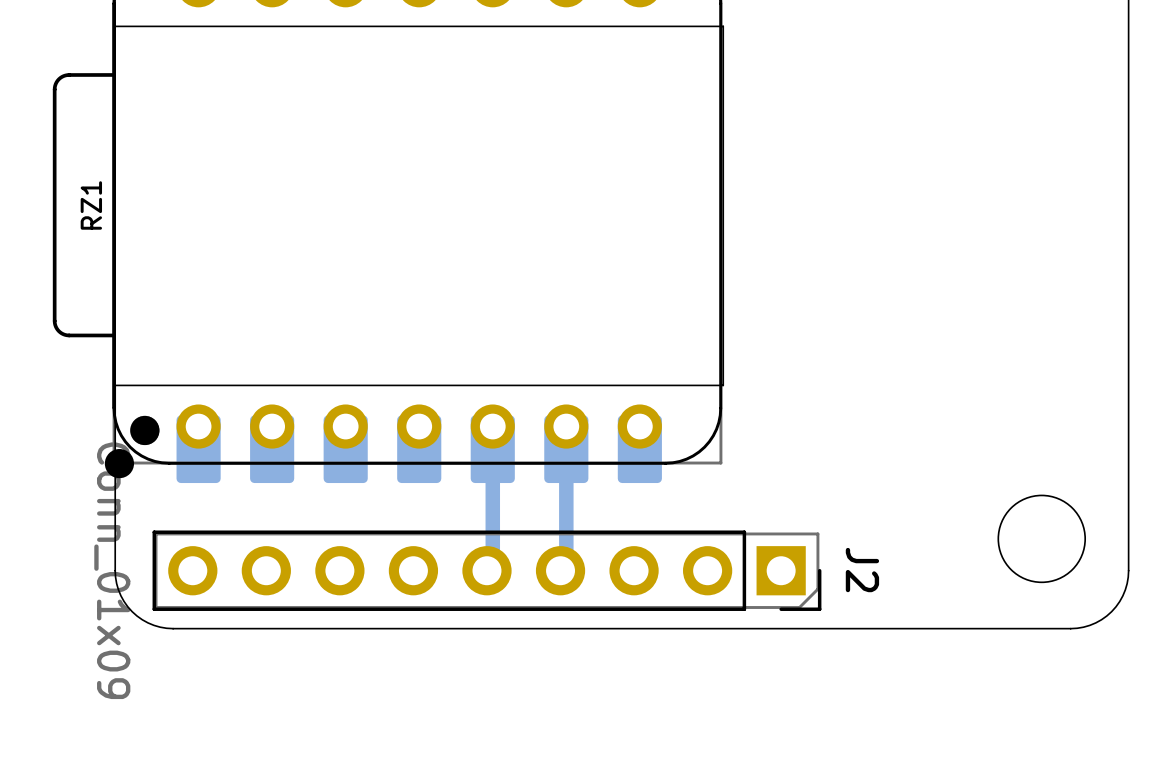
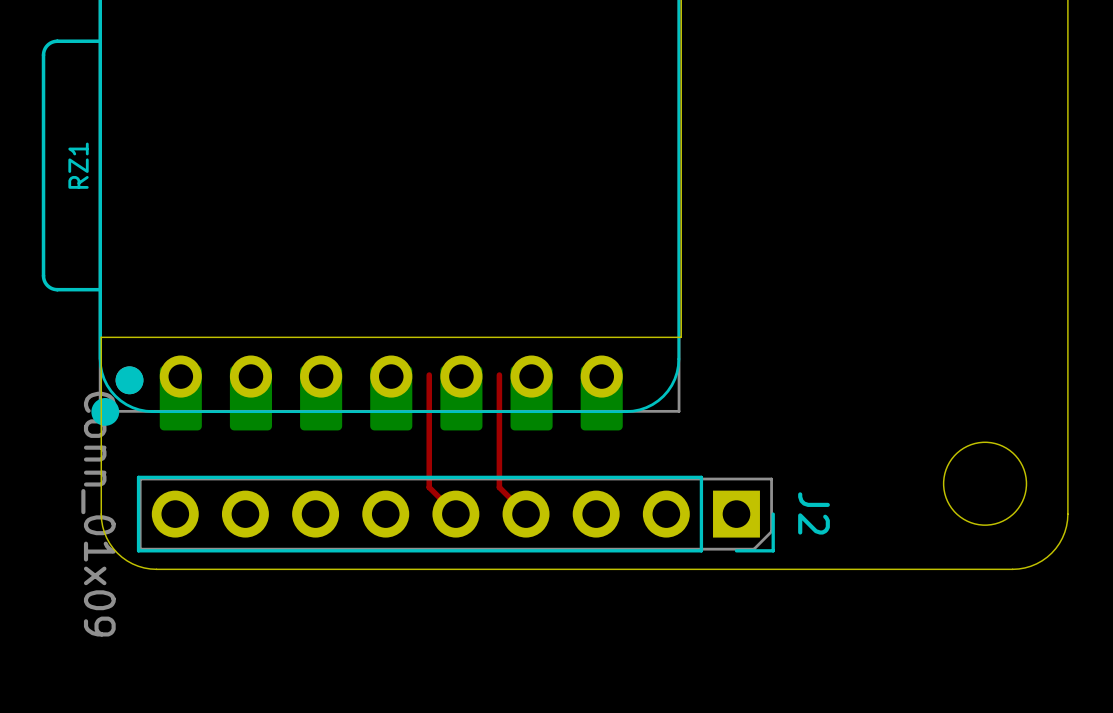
top track: none -> (429, 375) (429, 487) (455, 514)
top track: none -> (499, 375) (499, 487) (526, 514)
bottom track: (492, 449) (492, 564) (486, 570) -> none
bottom track: (566, 449) (566, 564) (560, 570) -> none

